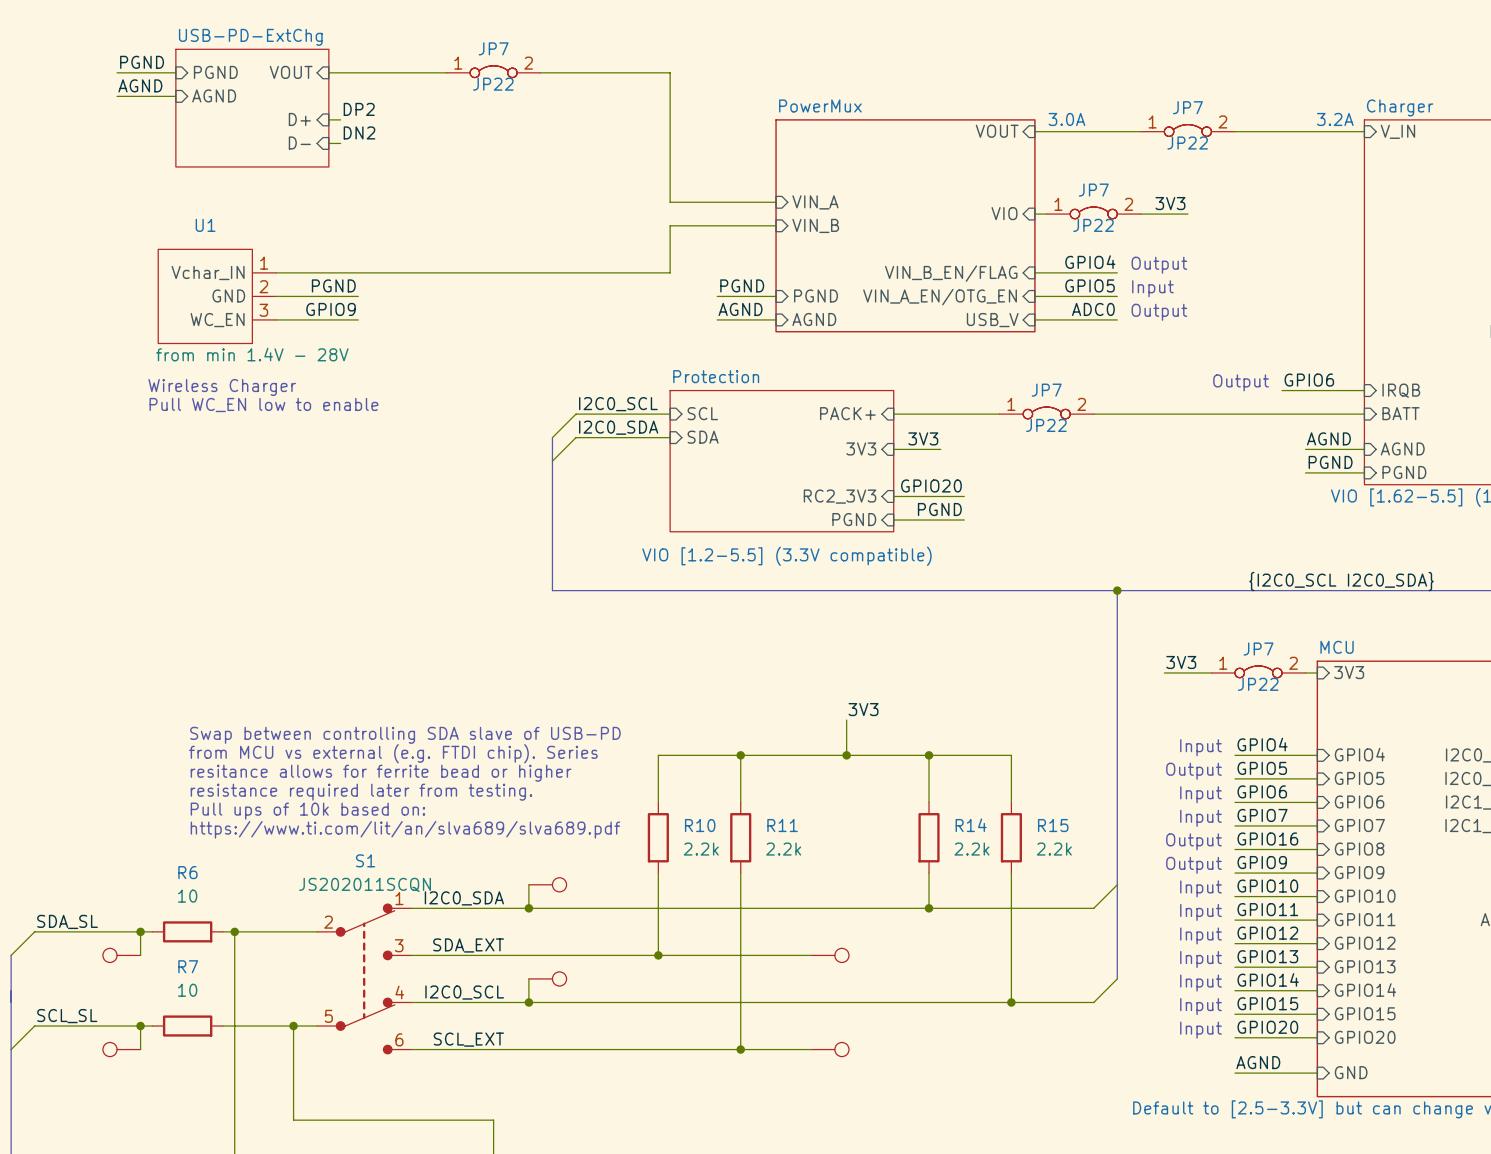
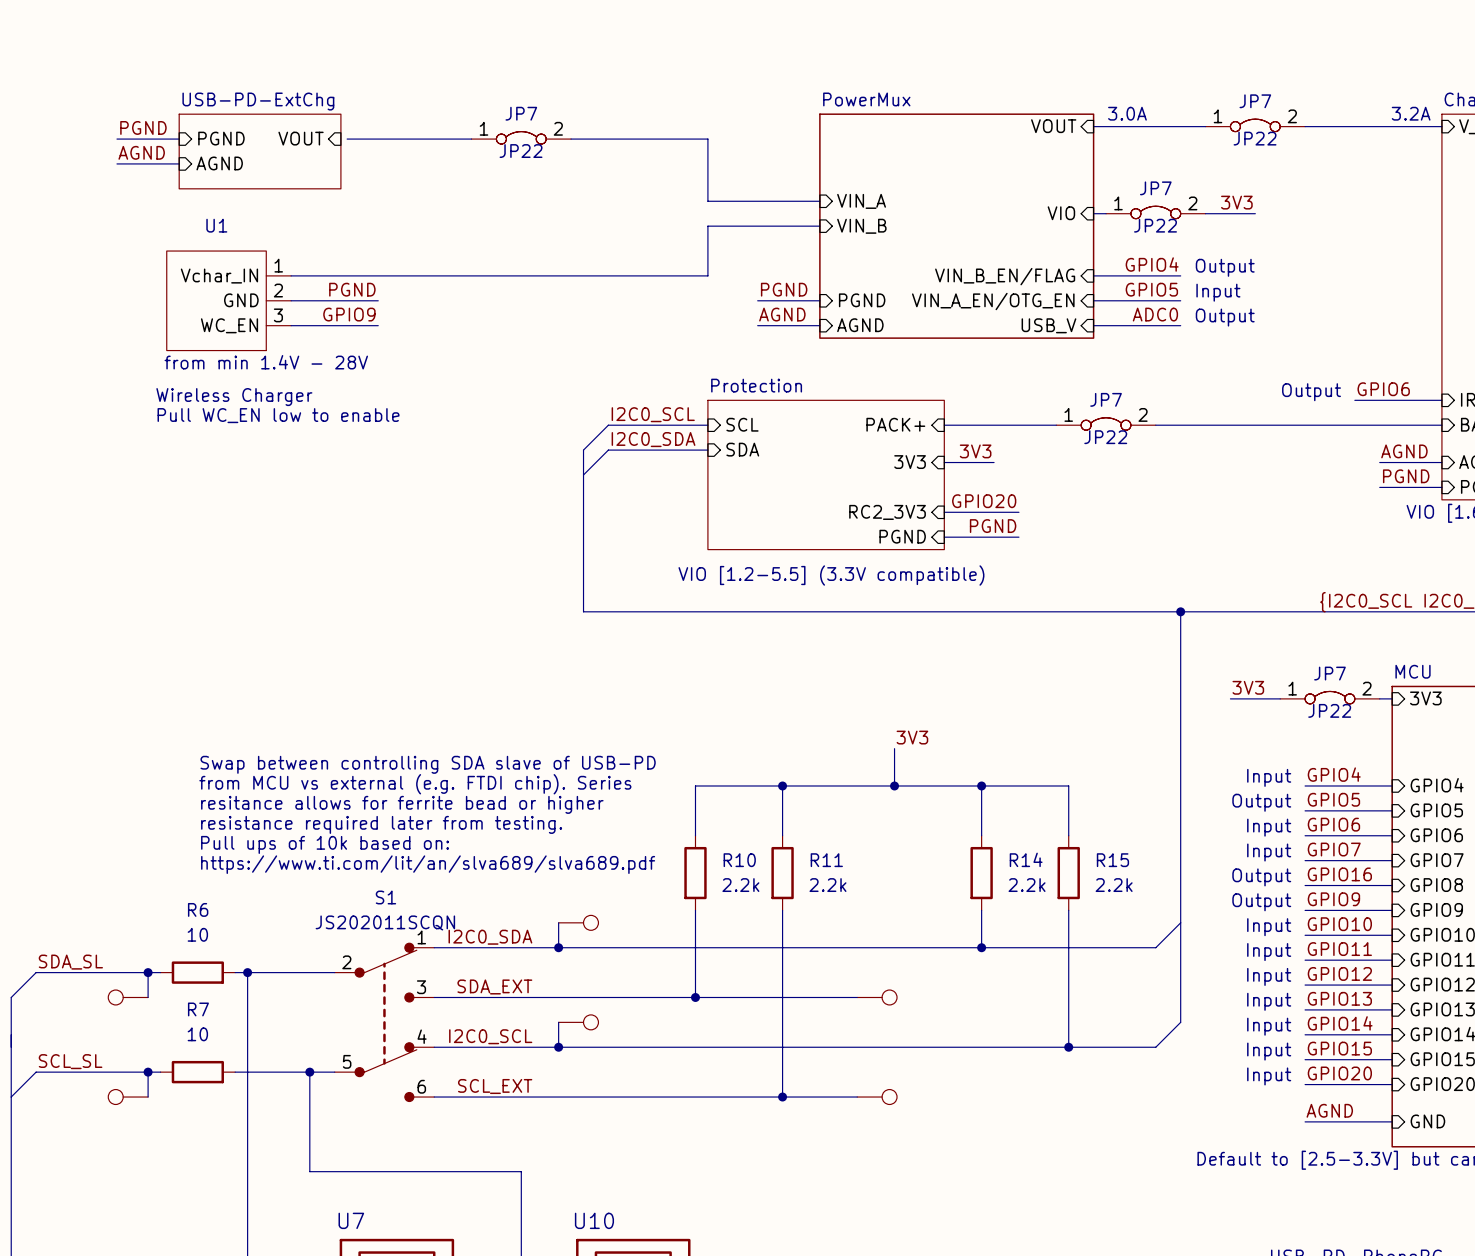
label position: PGND (142, 62) -> PGND (143, 127)
JP22 position: (493, 71) -> (521, 137)
JP7 position: (493, 71) -> (521, 137)
wire: (117, 72) (175, 72) -> (116, 139) (179, 139)
sheet pin position: PGND (215, 72) -> PGND (221, 138)
sheet pin position: VOUT (291, 72) -> VOUT (301, 138)
wire: (328, 72) (446, 72) -> none
wire: (540, 72) (670, 72) (670, 143) -> (571, 139) (707, 139)
label position: AGND (140, 85) -> AGND (141, 152)
sheet pin position: AGND (214, 95) -> AGND (219, 163)
wire: (117, 96) (175, 96) -> (116, 163) (179, 163)
sheet USB-PD-ExtChg: (252, 108) -> none
label: DP2 (359, 109) -> none
sheet pin: D+ (299, 119) -> none
wire: (328, 119) (340, 119) -> none
label: DN2 (359, 132) -> none
sheet pin: D- (299, 143) -> none
wire: none -> (359, 139) (471, 139)
sheet USB-PD-ExtChg: none -> (260, 151)

